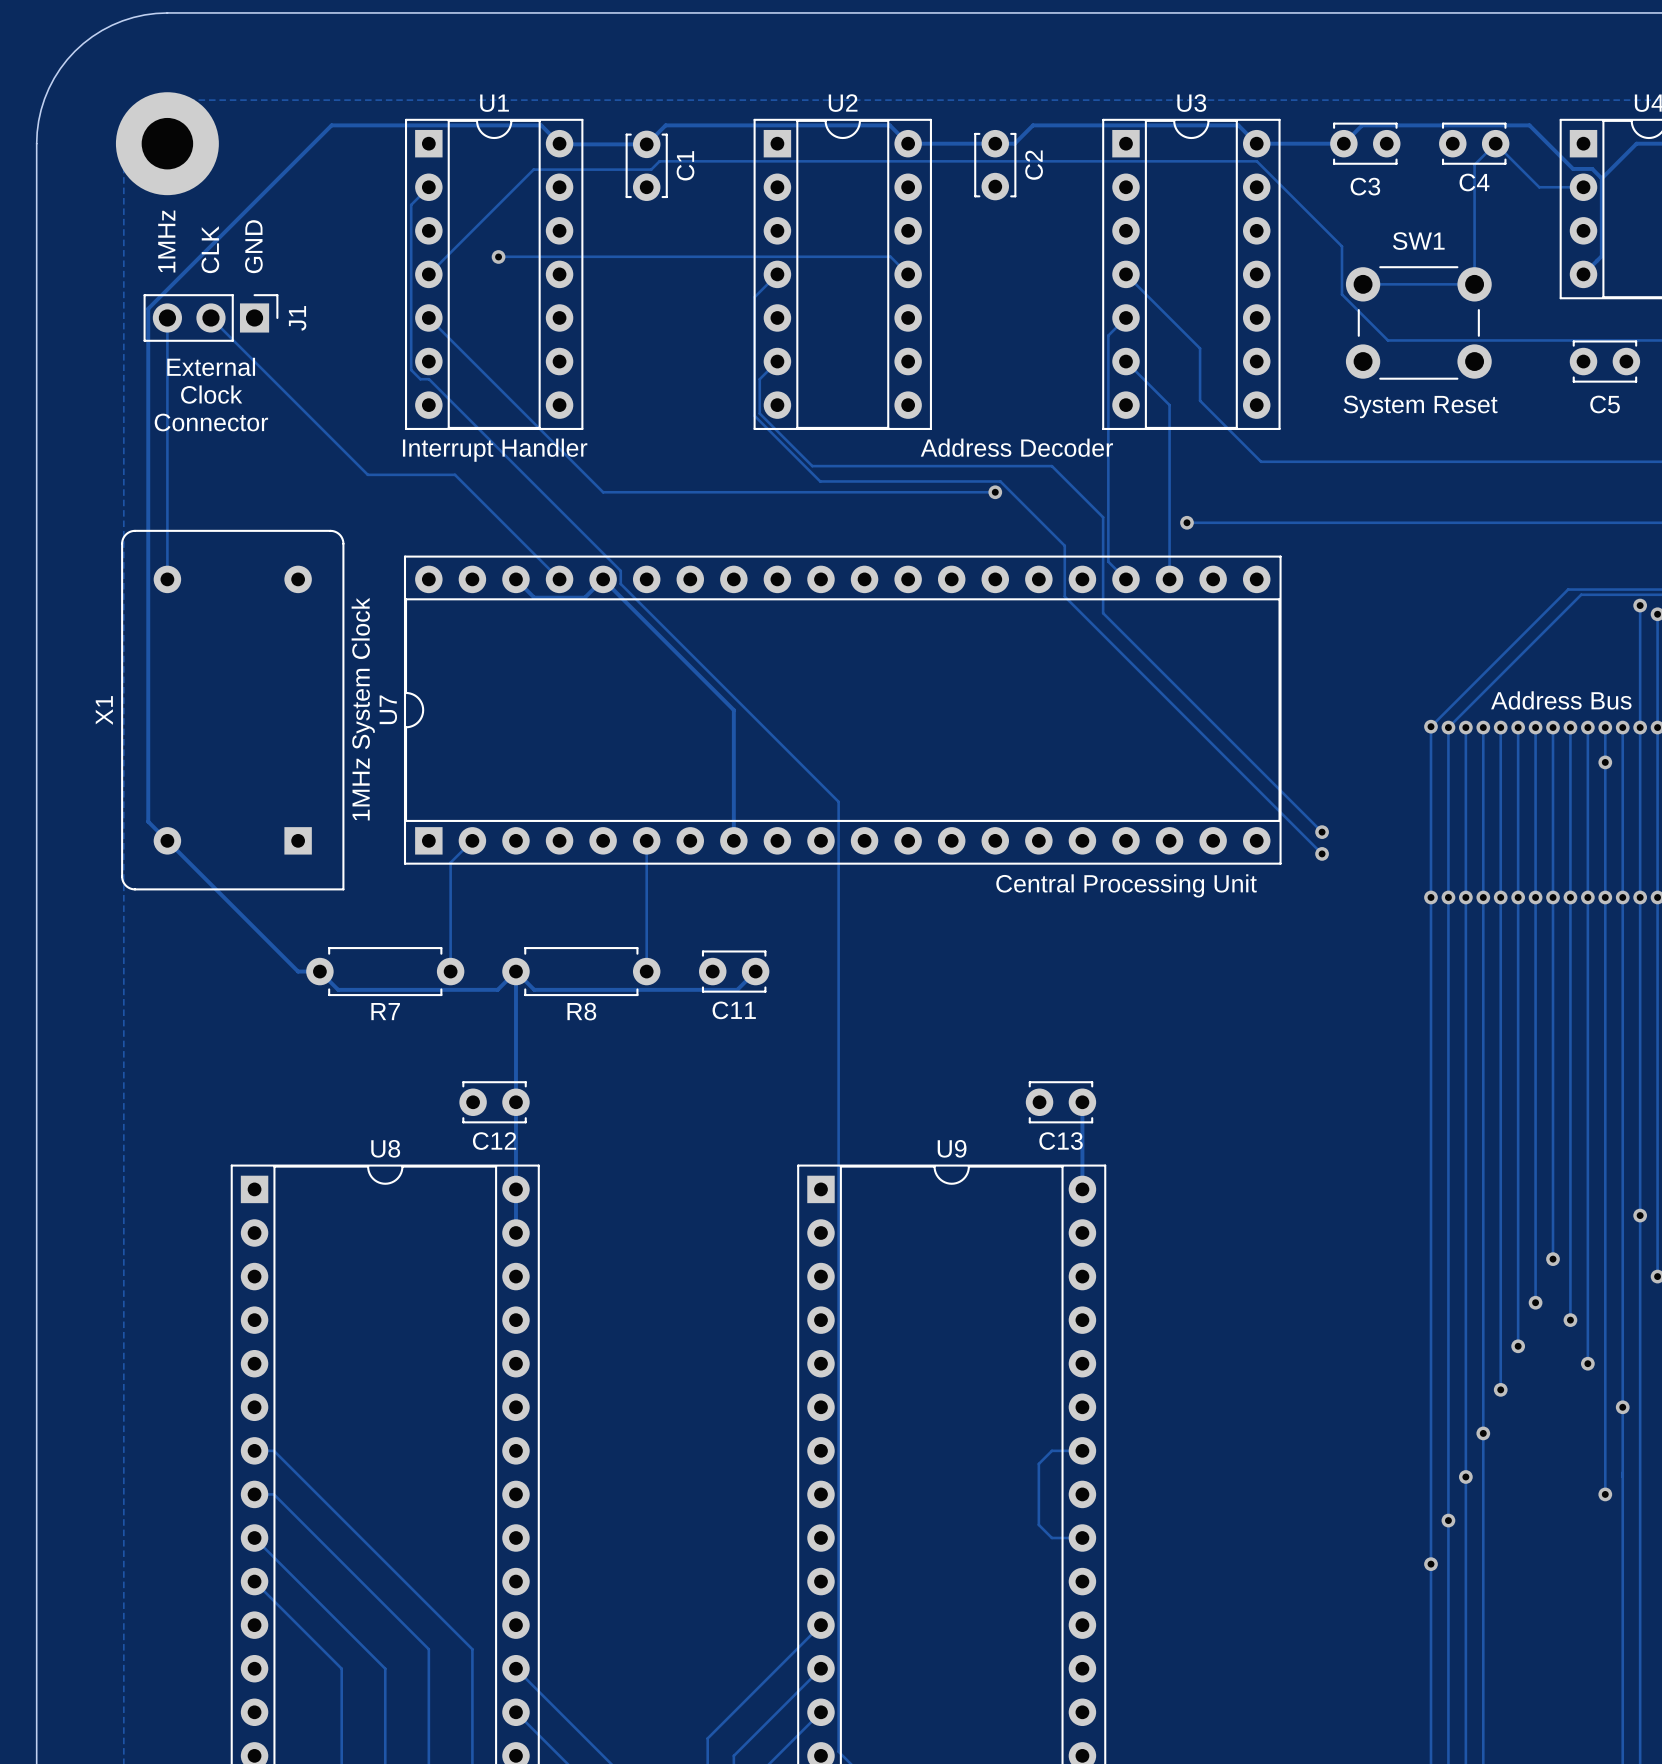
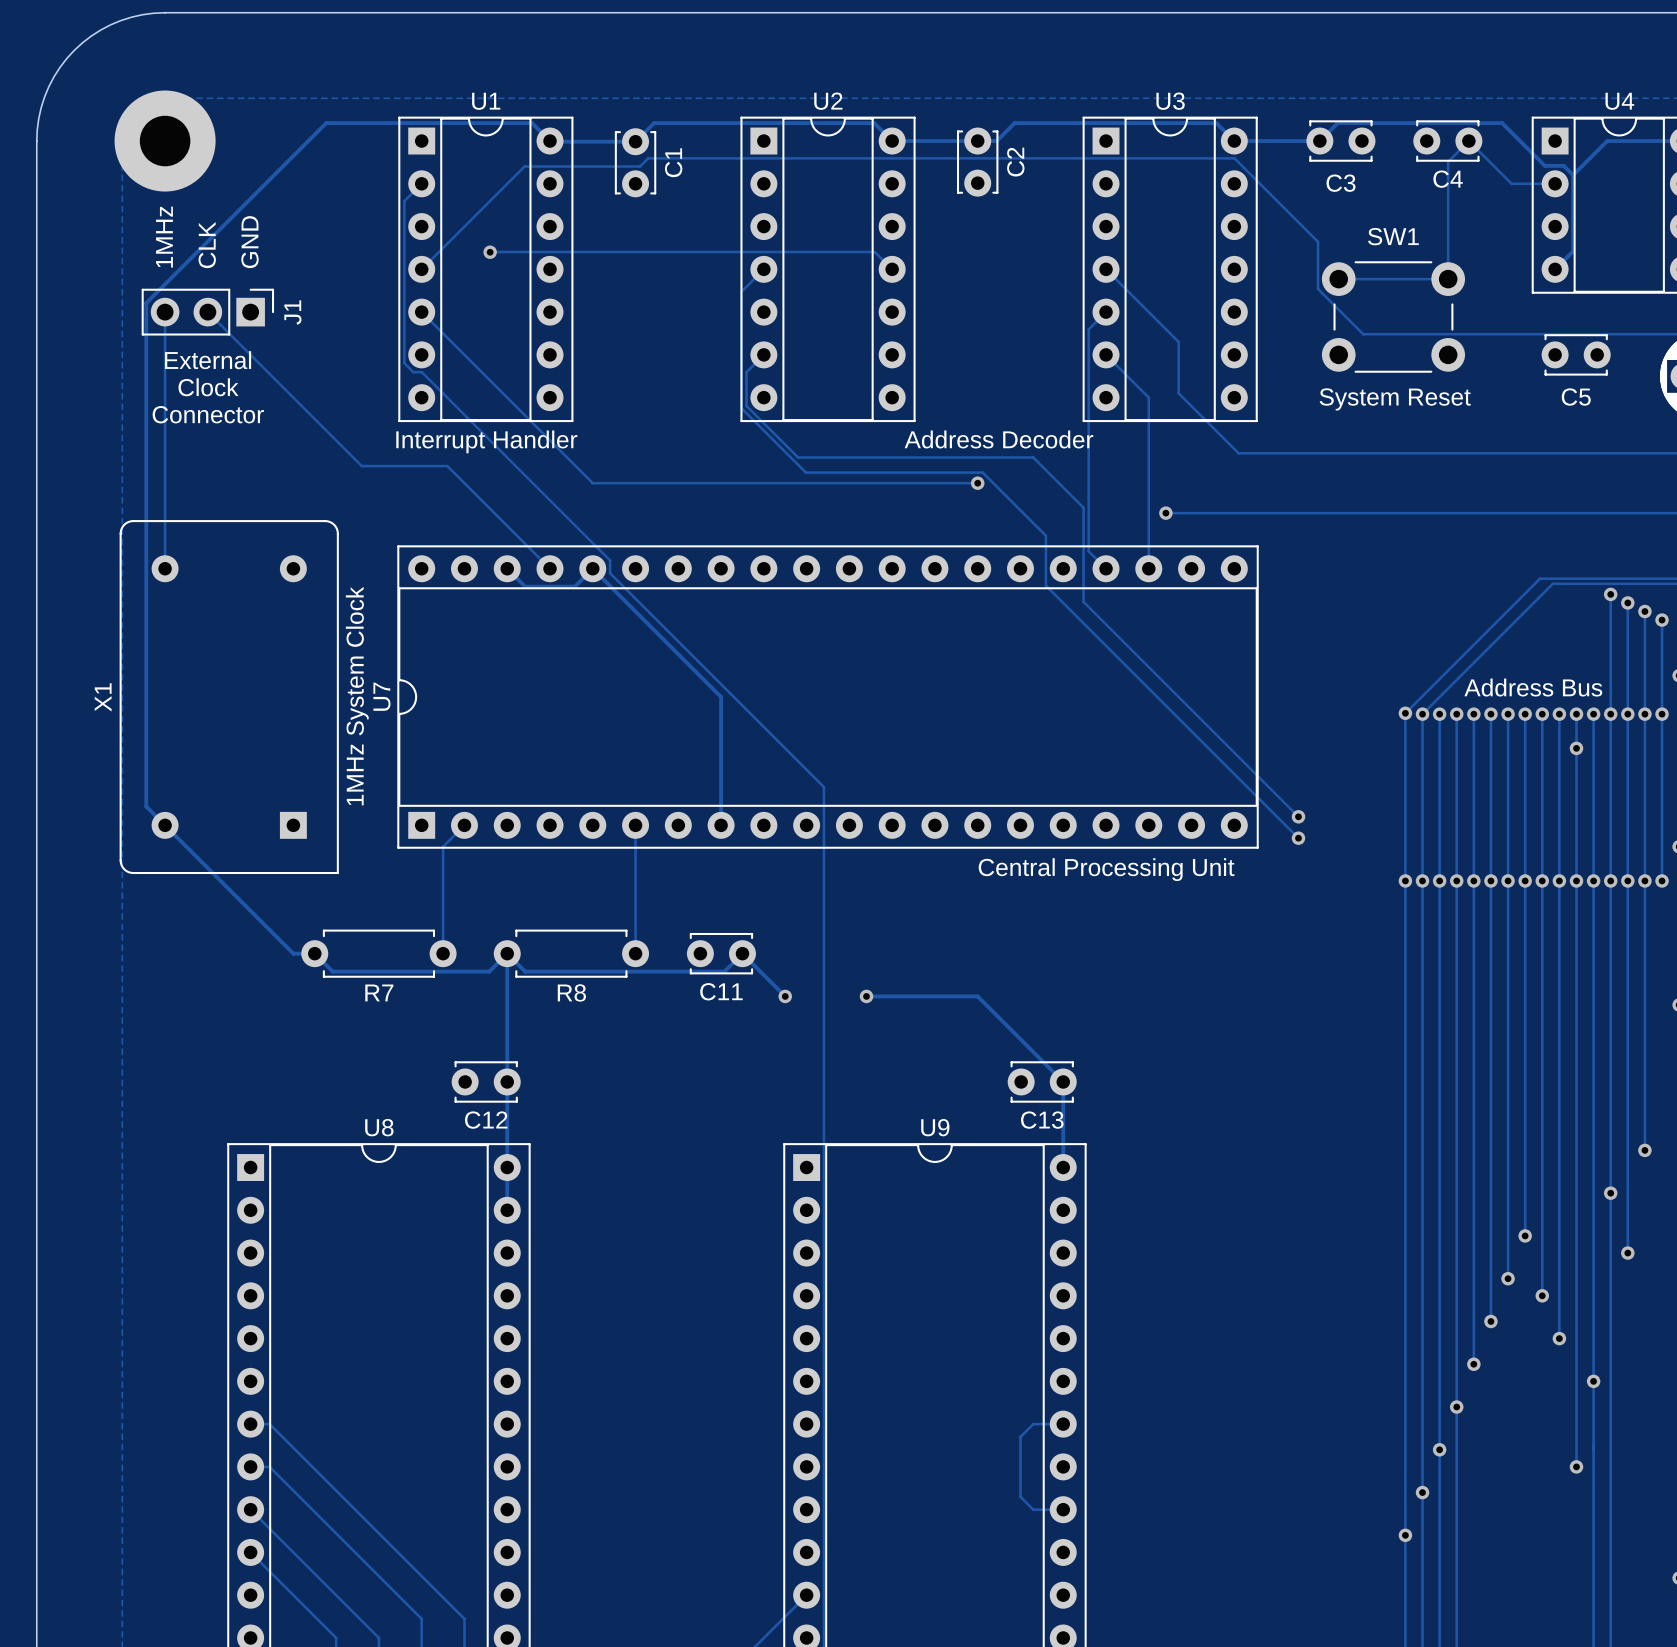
track: none -> (742, 953) (785, 996)
via: none -> (785, 996)
track: none -> (866, 996) (977, 996) (1063, 1081)
via: none -> (866, 996)

